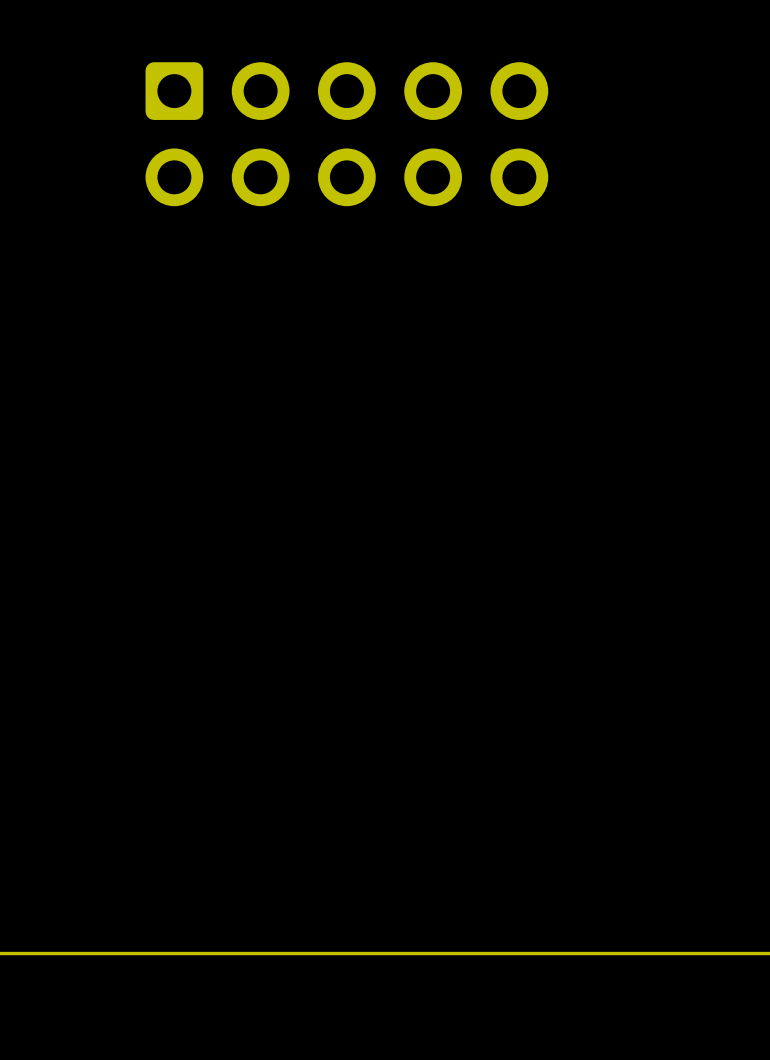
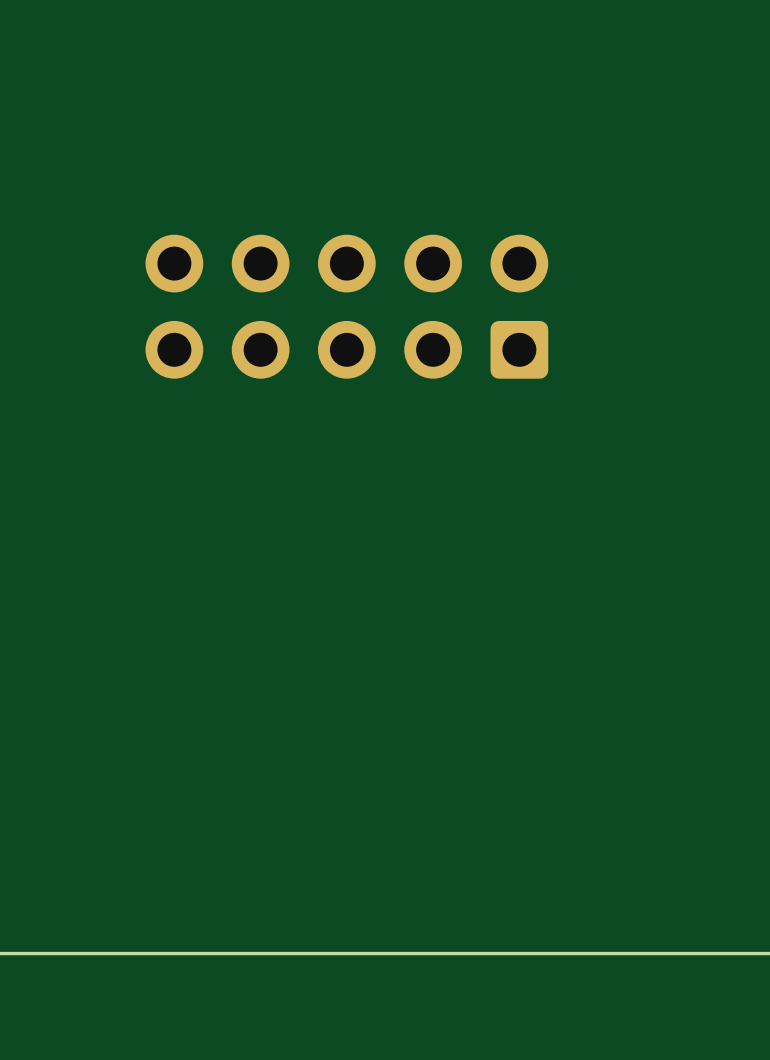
part rotation: 0° (346, 134) -> 180° (346, 306)

